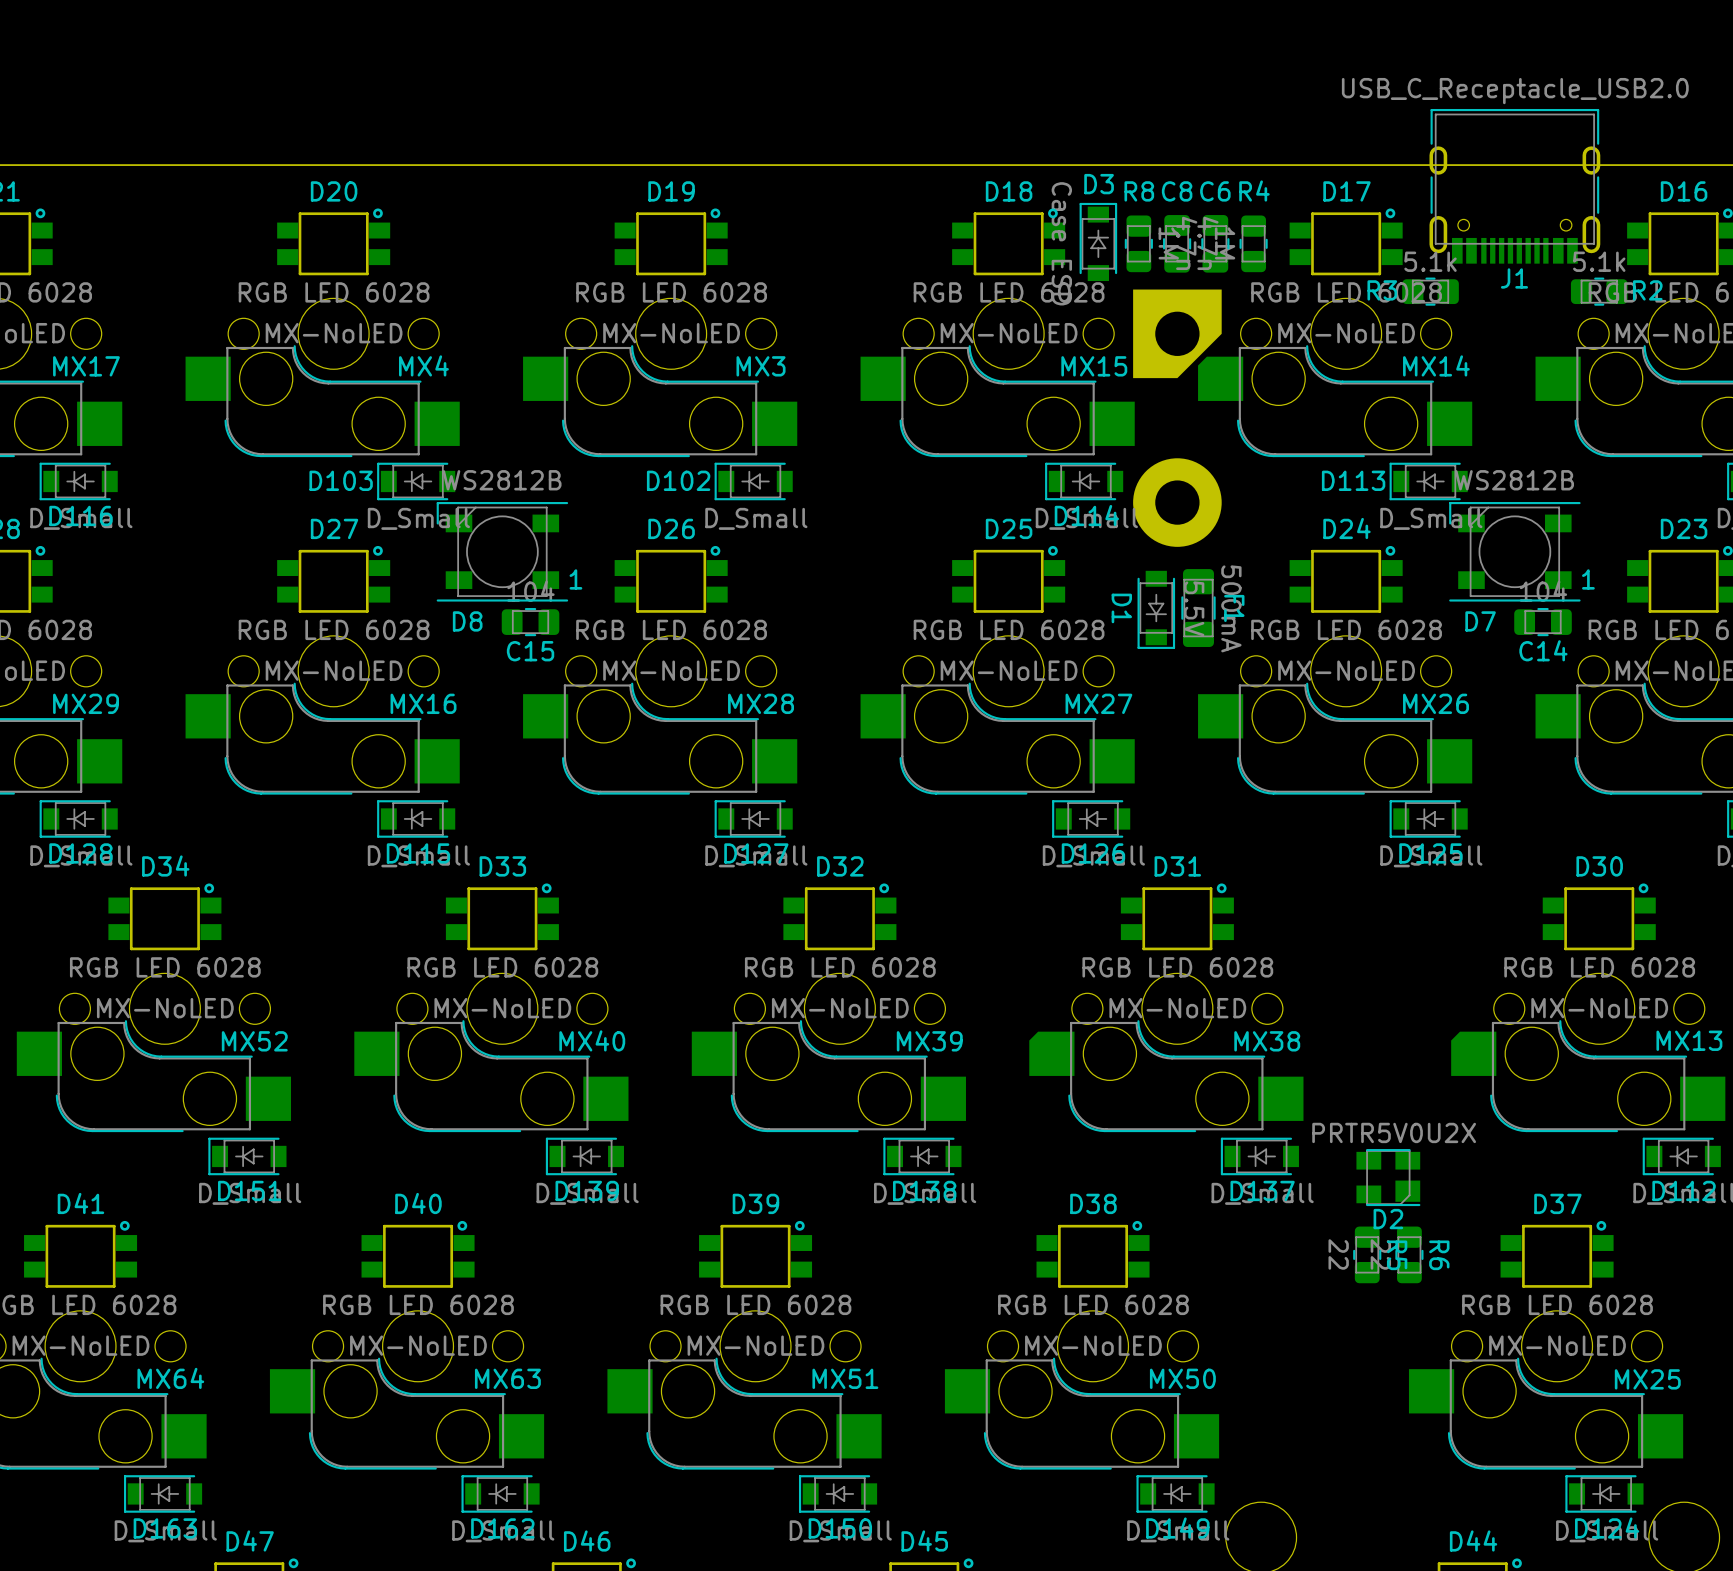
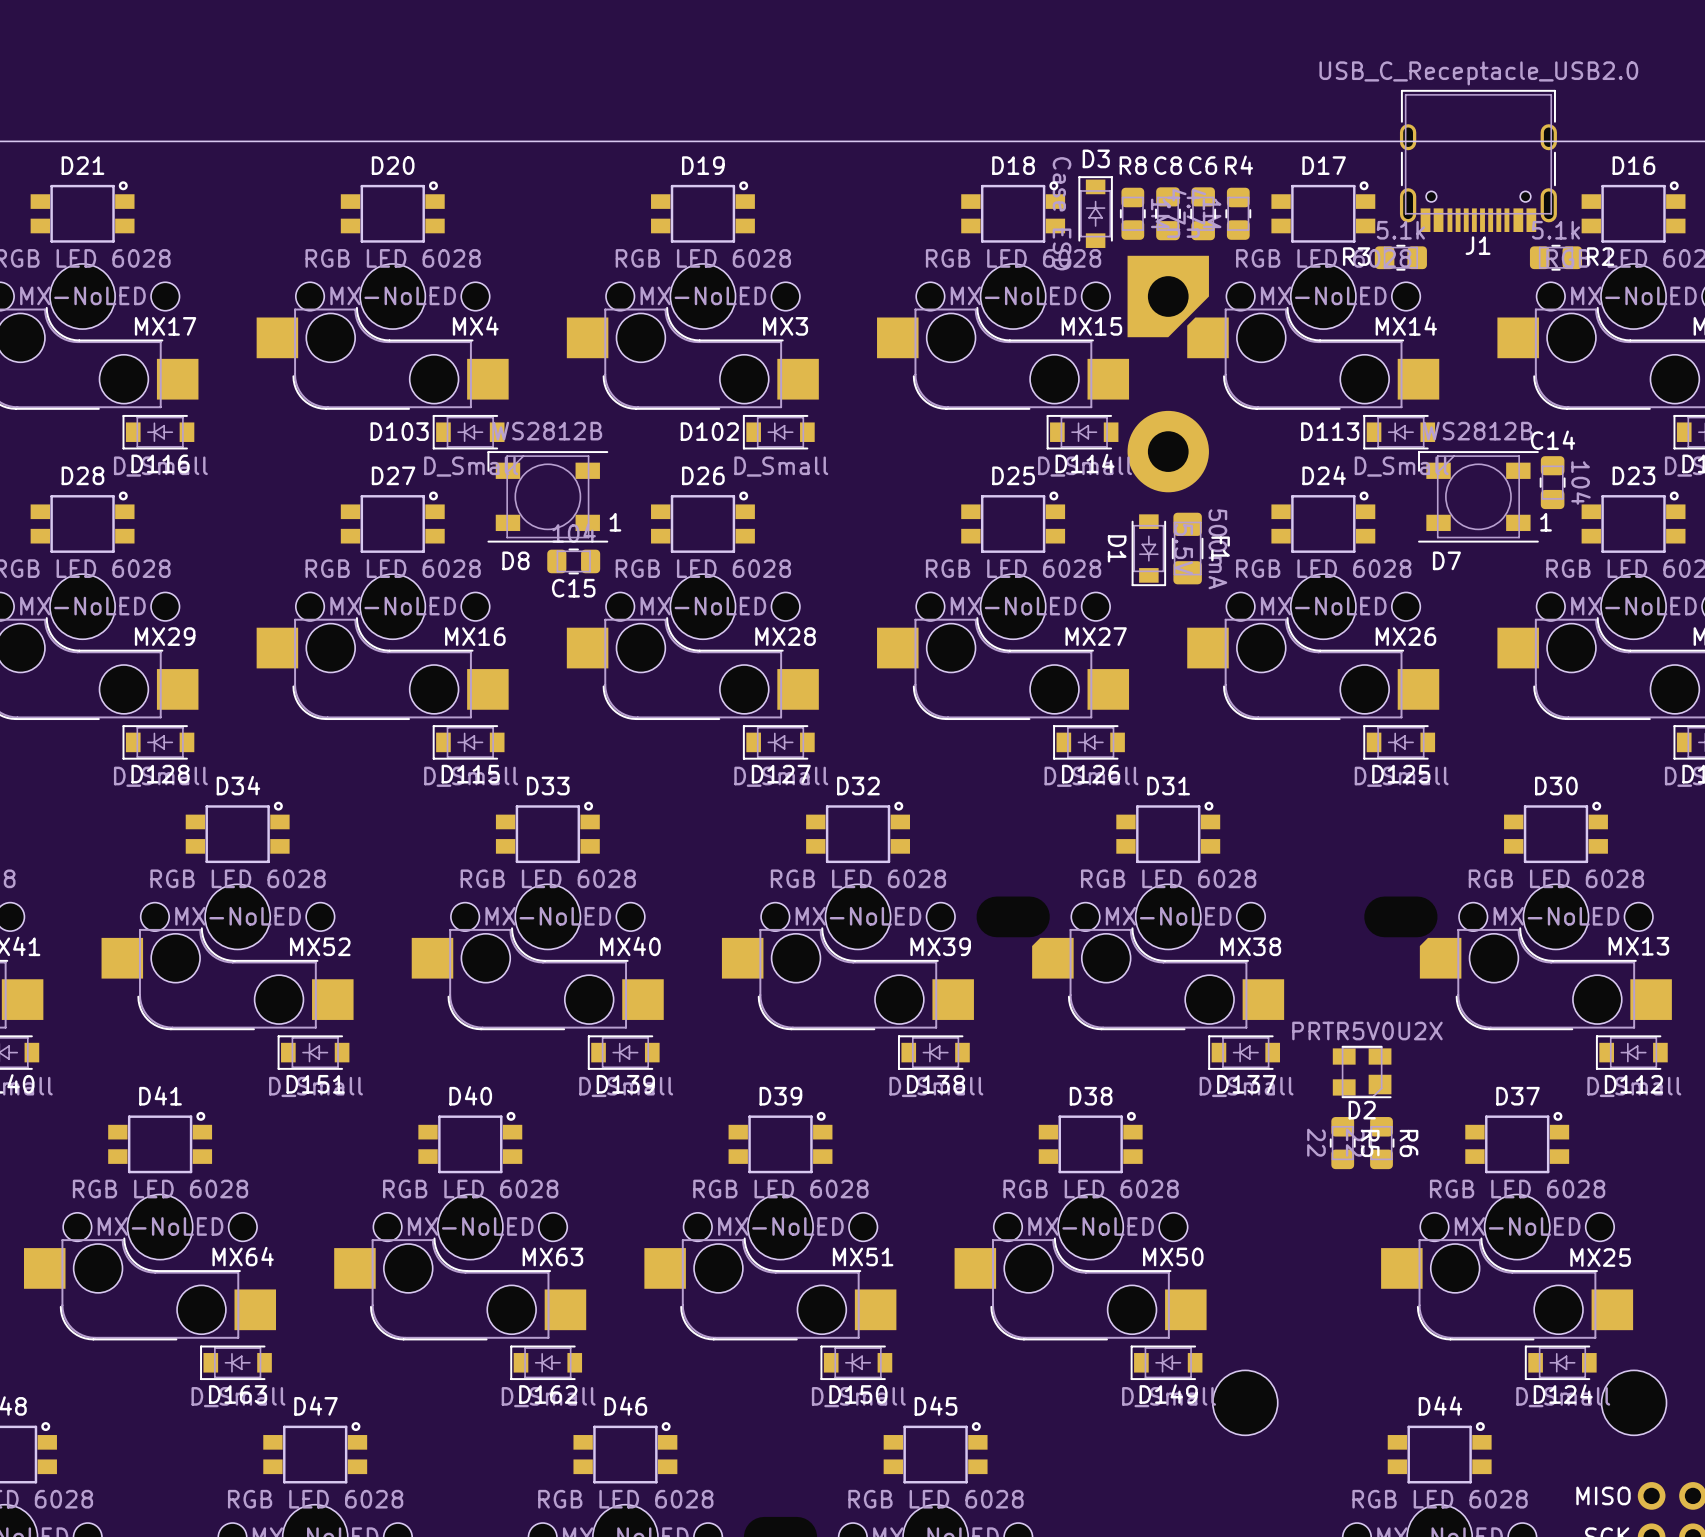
C14 rotation: 0° (1543, 622) -> 90° clockwise (1552, 482)
C14 position: (1543, 622) -> (1552, 482)
C14 name position: C14 (1543, 650) -> C14 (1553, 440)

